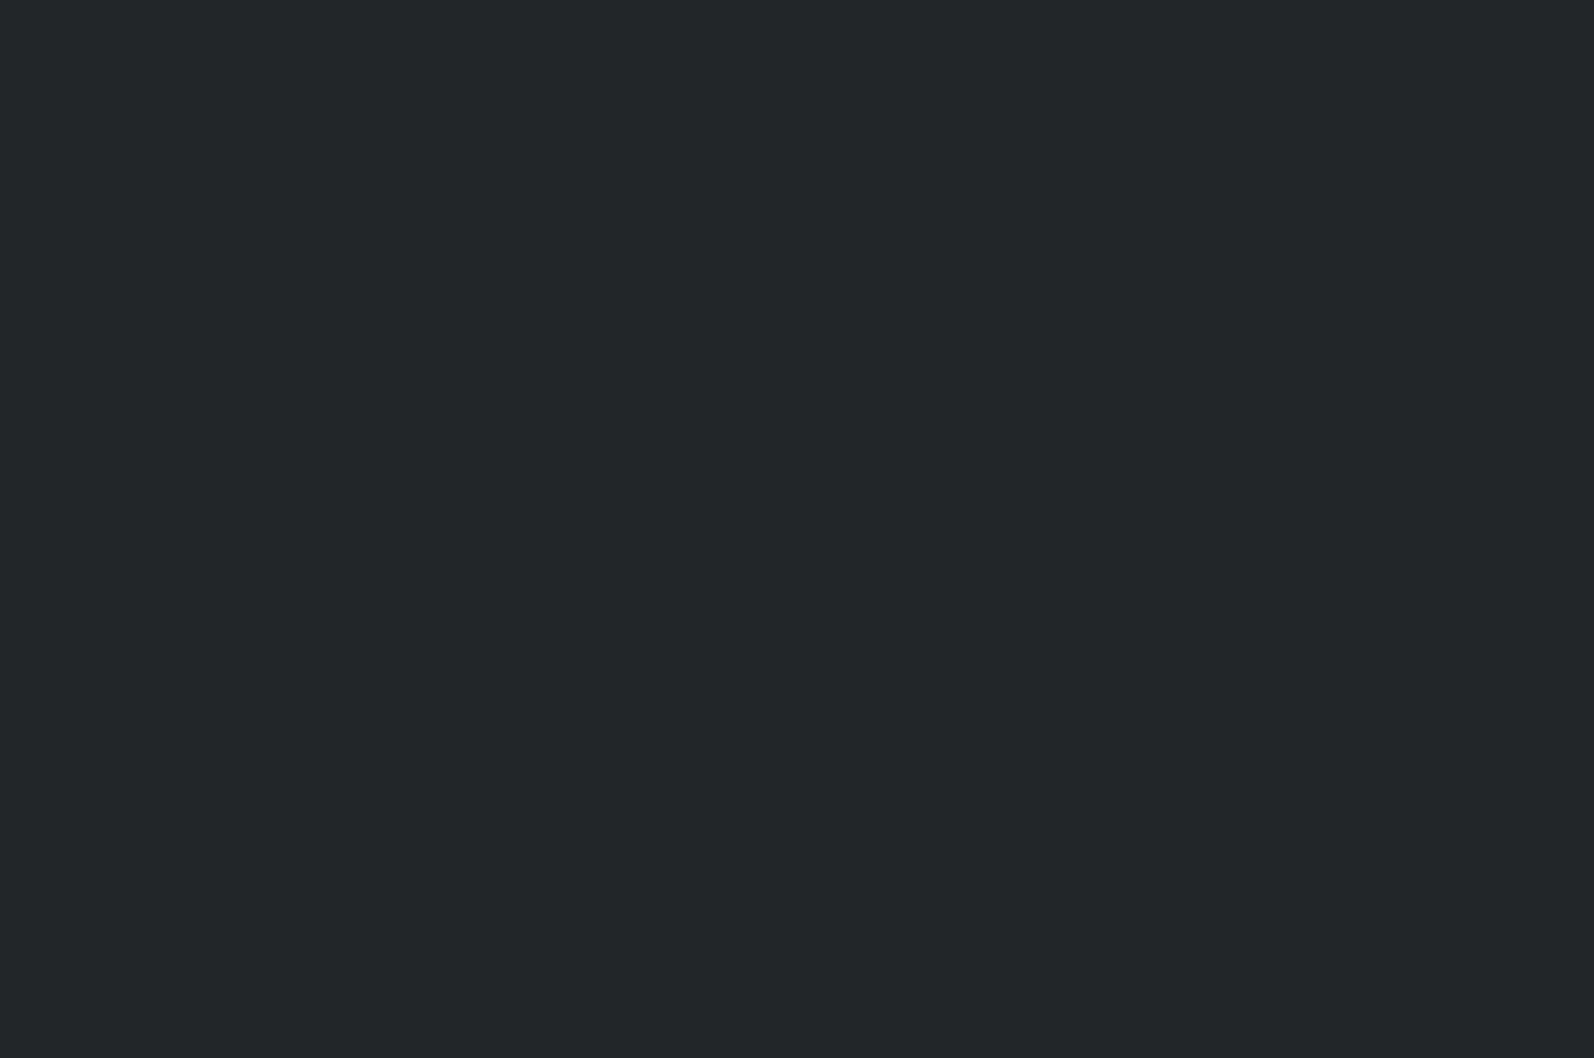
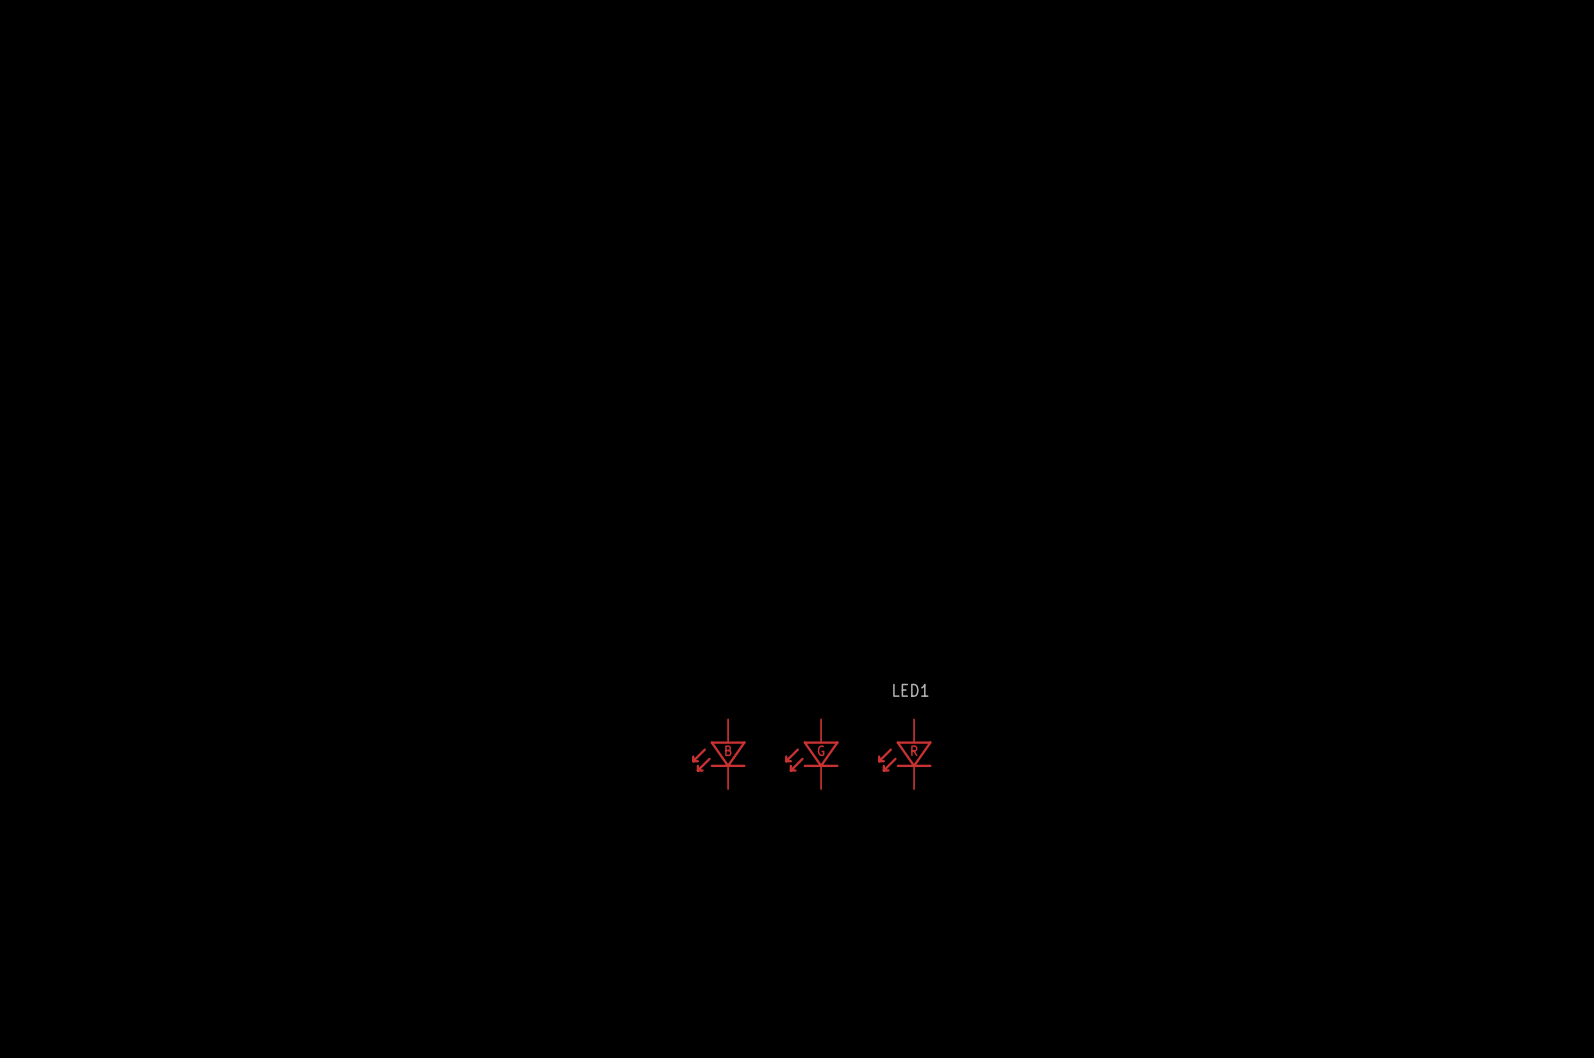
LED1: none -> (910, 690)
part: none -> (718, 754)
part: none -> (811, 754)
part: none -> (904, 754)

